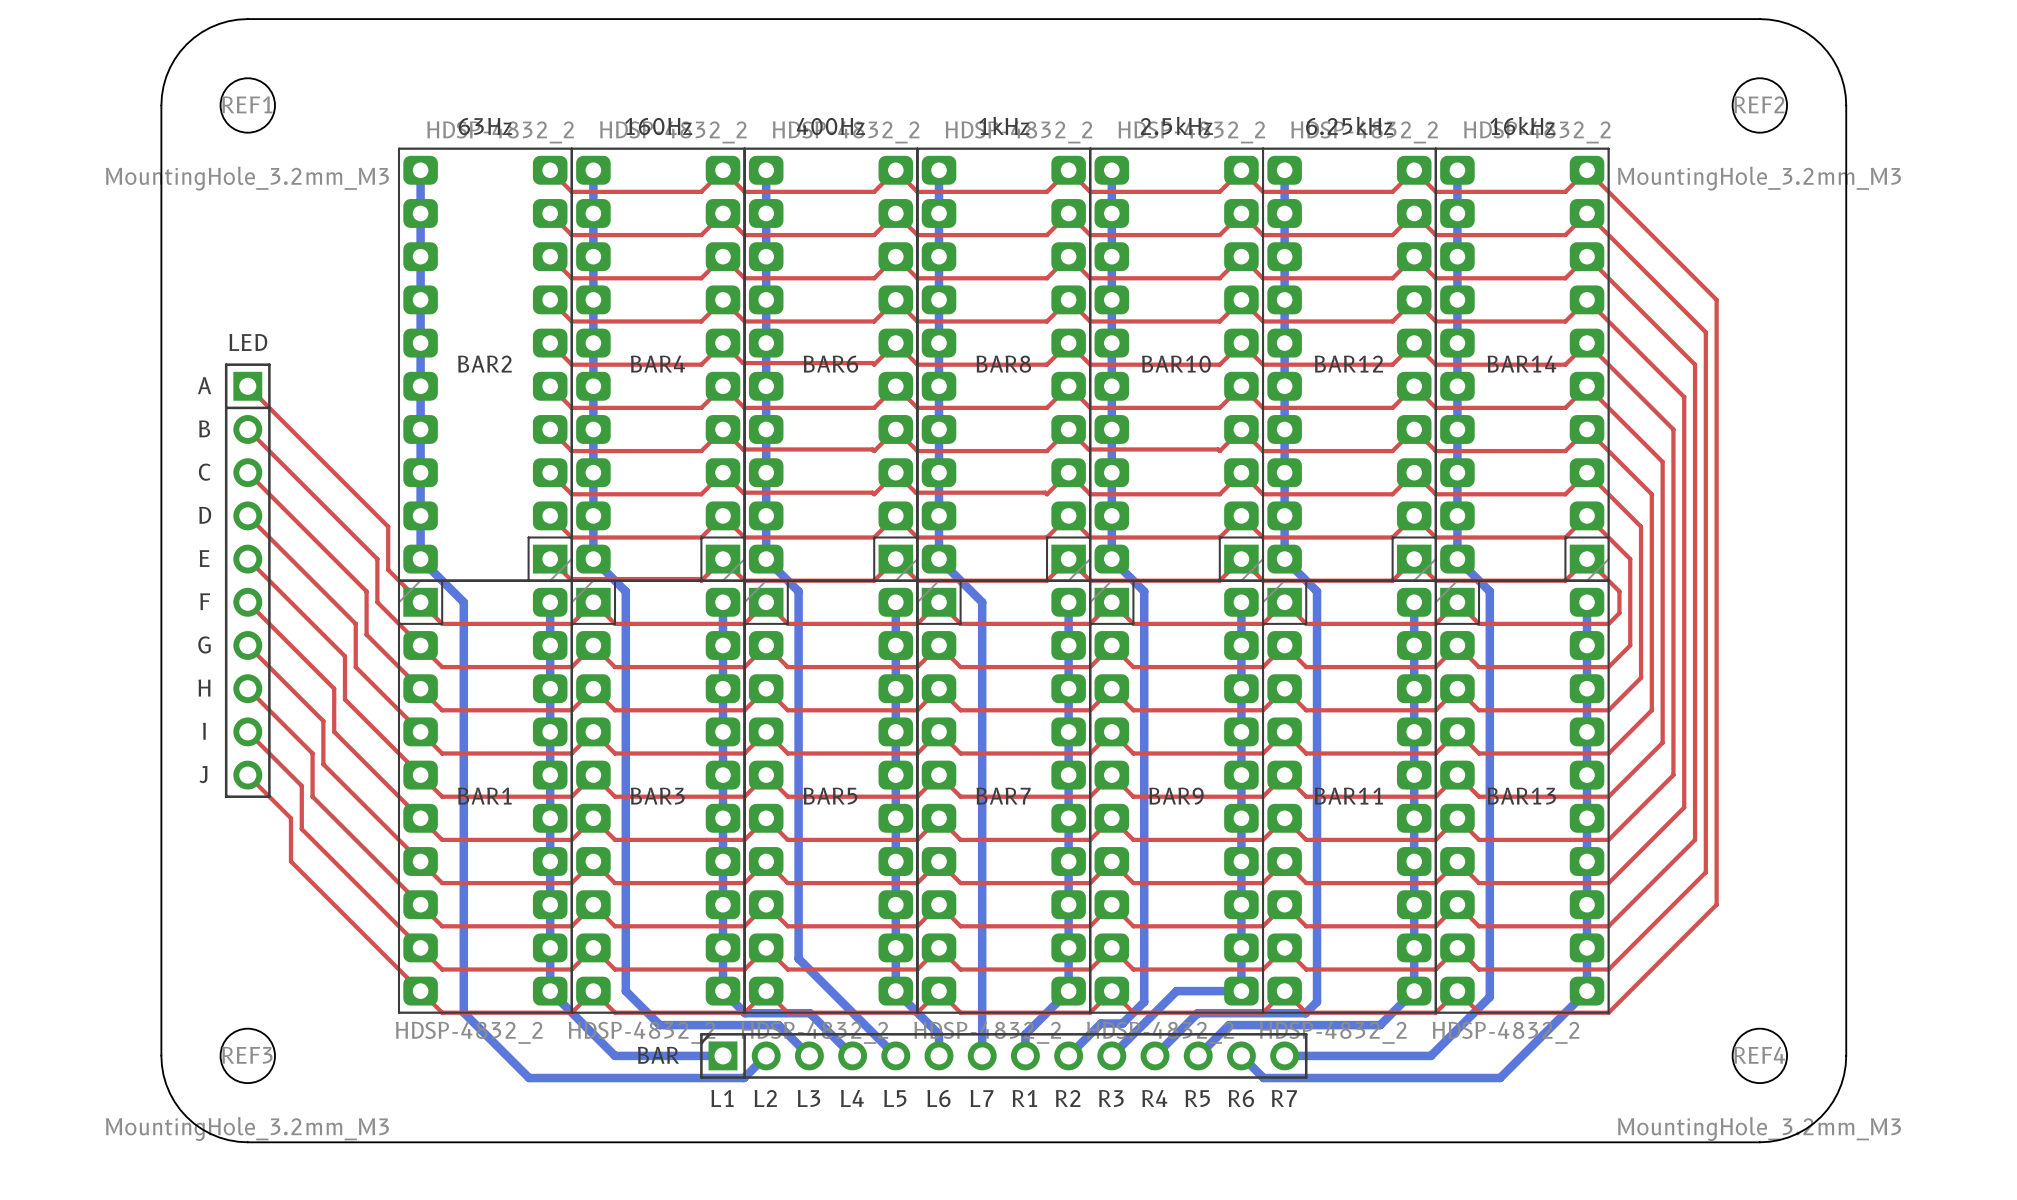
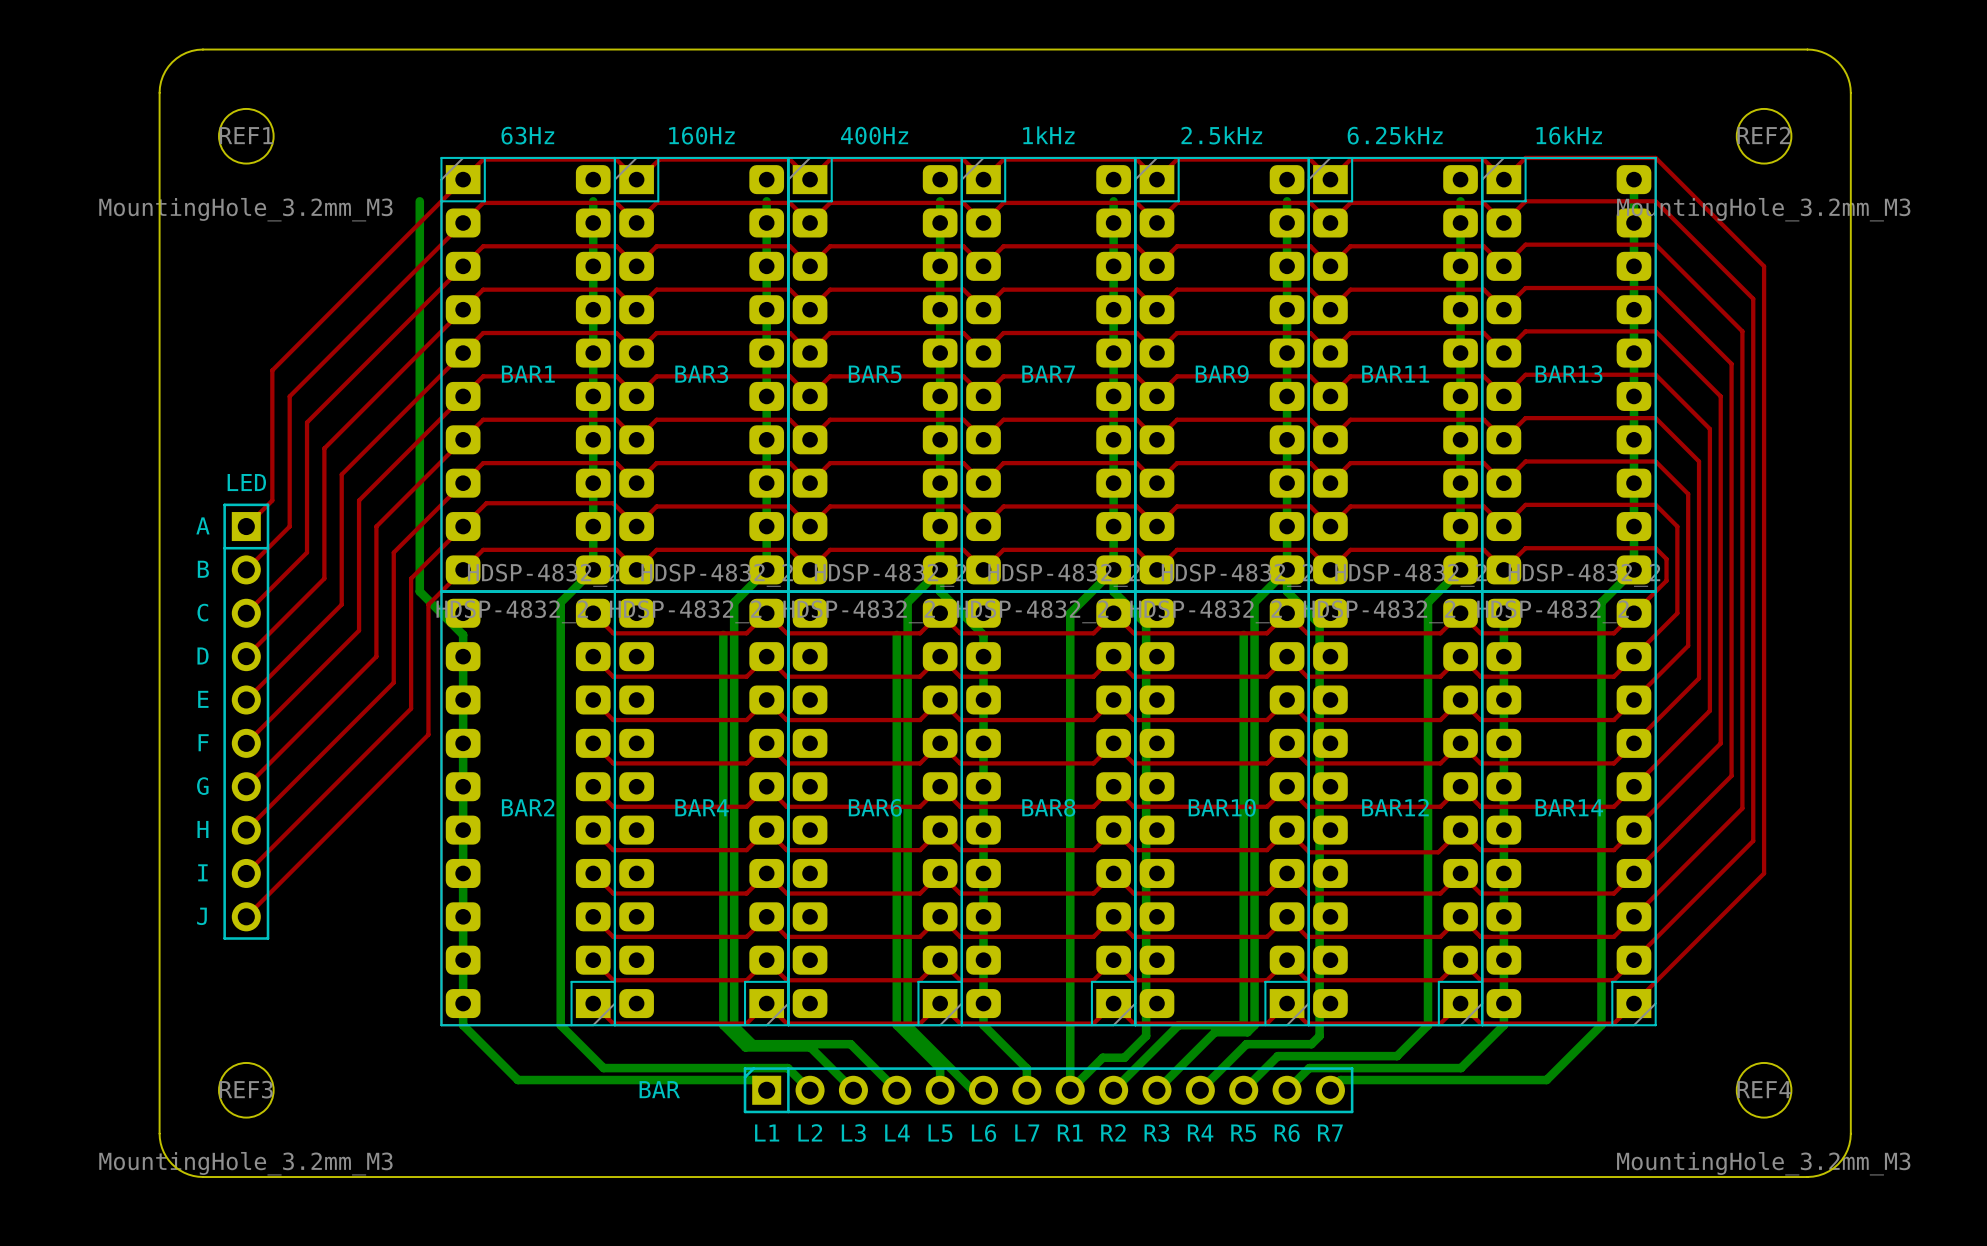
board edge: (247, 19) (219, 23) (201, 32) (186, 44) (174, 59) (166, 76) (161, 105) -> (246, 49) (197, 49) (181, 55) (172, 62) (162, 76) (159, 87) (159, 136)
board edge: (1759, 19) (1788, 23) (1805, 32) (1820, 44) (1833, 59) (1841, 76) (1846, 105) -> (1764, 49) (1817, 50) (1830, 56) (1838, 62) (1844, 69) (1849, 83) (1850, 136)
text position: 1kHz (1004, 125) -> 1kHz (1048, 135)
text position: 2.5kHz (1176, 125) -> 2.5kHz (1221, 135)
text position: 6.25kHz (1349, 125) -> 6.25kHz (1395, 135)
text position: 16kHz (1522, 125) -> 16kHz (1569, 135)
text position: 63Hz (485, 126) -> 63Hz (527, 135)
text position: 160Hz (658, 126) -> 160Hz (701, 135)
text position: 400Hz (831, 126) -> 400Hz (874, 135)
bottom track: none -> (1633, 179) (1633, 569) (1601, 602) (1601, 1025) (1546, 1080) (1340, 1080) (1330, 1090)
top track: (550, 170) (571, 191) (701, 191) (723, 170) (744, 191) (874, 191) (895, 170) (917, 191) (1047, 191) (1068, 170) (1090, 191) (1219, 191) (1241, 170) (1263, 191) (1392, 191) (1414, 170) (1435, 191) (1565, 191) (1587, 170) (1716, 299) (1716, 364) -> (246, 700) (341, 604) (341, 474) (483, 333) (616, 333) (636, 353) (656, 333) (790, 333) (810, 353) (830, 333) (963, 333) (983, 353) (1003, 333) (1136, 333) (1156, 353) (1177, 333) (1310, 333) (1330, 353) (1350, 333) (1483, 333) (1503, 353) (1525, 331) (1655, 331) (1720, 396)
top track: (550, 213) (571, 235) (701, 235) (723, 213) (744, 235) (874, 235) (895, 213) (917, 235) (1047, 235) (1068, 213) (1090, 235) (1219, 235) (1241, 213) (1263, 235) (1392, 235) (1414, 213) (1435, 235) (1565, 235) (1587, 213) (1705, 332) (1705, 397) -> (246, 743) (359, 630) (359, 500) (483, 376) (616, 376) (636, 396) (656, 376) (790, 376) (810, 396) (830, 376) (963, 376) (983, 396) (1003, 376) (1136, 376) (1156, 396) (1177, 376) (1310, 376) (1330, 396) (1350, 376) (1483, 376) (1503, 396) (1525, 374) (1655, 374) (1709, 428)
top track: (550, 256) (571, 278) (701, 278) (723, 256) (744, 278) (874, 278) (895, 256) (917, 278) (1047, 278) (1068, 256) (1090, 278) (1219, 278) (1241, 256) (1263, 278) (1392, 278) (1414, 256) (1435, 278) (1565, 278) (1587, 256) (1695, 364) (1695, 429) -> (376, 591) (376, 526) (483, 419) (616, 419) (636, 439) (656, 419) (790, 419) (810, 439) (830, 419) (963, 419) (983, 439) (1003, 419) (1136, 419) (1156, 439) (1177, 419) (1310, 419) (1330, 439) (1350, 419) (1483, 419) (1503, 439) (1525, 418) (1655, 418) (1699, 461)
top track: (550, 299) (571, 321) (701, 321) (723, 299) (744, 321) (874, 321) (895, 299) (917, 321) (1047, 321) (1068, 299) (1090, 321) (1219, 321) (1241, 299) (1263, 321) (1392, 321) (1414, 299) (1435, 321) (1565, 321) (1587, 299) (1684, 397) (1684, 461) -> (246, 830) (393, 682) (393, 552) (483, 463) (616, 463) (636, 483) (656, 463) (790, 463) (810, 483) (830, 463) (963, 463) (983, 483) (1003, 463) (1136, 463) (1156, 483) (1177, 463) (1310, 463) (1330, 483) (1350, 463) (1483, 463) (1503, 483) (1525, 461) (1655, 461) (1688, 494)
text position: LED (248, 342) -> LED (246, 482)
top track: (550, 343) (571, 364) (701, 364) (723, 343) (742, 363) (872, 363) (874, 364) (895, 343) (917, 364) (1047, 364) (1068, 343) (1090, 364) (1219, 364) (1241, 343) (1263, 364) (1392, 364) (1414, 343) (1435, 364) (1565, 364) (1587, 343) (1673, 429) (1673, 494) -> (246, 873) (411, 708) (411, 578) (486, 503) (613, 503) (636, 526) (656, 506) (790, 506) (810, 526) (830, 506) (963, 506) (983, 526) (1003, 506) (1136, 506) (1156, 526) (1177, 506) (1310, 506) (1330, 526) (1350, 506) (1483, 506) (1503, 526) (1525, 504) (1655, 504) (1677, 526)
BAR2 position: (485, 364) -> (528, 808)
BAR4 position: (658, 364) -> (701, 808)
BAR6 position: (831, 364) -> (875, 808)
BAR8 position: (1003, 364) -> (1048, 808)
BAR10 position: (1176, 364) -> (1222, 808)
BAR12 position: (1349, 364) -> (1395, 808)
BAR14 position: (1522, 364) -> (1568, 808)
text position: A (204, 385) -> A (202, 525)
top track: (247, 386) (388, 526) (388, 569) (442, 623) (571, 623) (593, 602) (615, 623) (744, 623) (766, 602) (787, 623) (917, 623) (939, 602) (960, 623) (1090, 623) (1111, 602) (1133, 623) (1263, 623) (1284, 602) (1306, 623) (1435, 623) (1457, 602) (1479, 623) (1608, 623) (1619, 613) (1619, 591) (1587, 559) (1565, 580) (1435, 580) (1414, 559) (1392, 580) (1263, 580) (1241, 559) (1219, 580) (1090, 580) (1068, 559) (1047, 580) (917, 580) (895, 559) (874, 580) (744, 580) (723, 559) (701, 580) (699, 579) (570, 579) (550, 559) -> none
top track: (550, 386) (571, 407) (701, 407) (723, 386) (744, 407) (874, 407) (895, 386) (917, 407) (1047, 407) (1068, 386) (1090, 407) (1219, 407) (1241, 386) (1263, 407) (1392, 407) (1414, 386) (1435, 407) (1565, 407) (1587, 386) (1662, 461) (1662, 526) -> (246, 916) (428, 734) (428, 604) (483, 549) (616, 549) (636, 569) (656, 549) (790, 549) (810, 569) (830, 549) (963, 549) (983, 569) (1003, 549) (1136, 549) (1156, 569) (1177, 549) (1310, 549) (1330, 569) (1350, 549) (1483, 549) (1503, 569) (1525, 548) (1655, 548) (1666, 559)
line: (226, 407) (269, 407) -> (224, 548) (268, 548)
text position: B (204, 428) -> B (203, 569)
top track: (247, 429) (377, 559) -> none
top track: (550, 429) (571, 451) (701, 451) (723, 429) (742, 449) (872, 449) (874, 451) (895, 429) (917, 451) (1047, 451) (1068, 429) (1088, 449) (1218, 449) (1219, 451) (1241, 429) (1263, 451) (1392, 451) (1414, 429) (1435, 451) (1565, 451) (1587, 429) (1651, 494) (1651, 710) (1608, 753) (1479, 753) (1457, 731) (1435, 753) (1306, 753) (1284, 731) (1263, 753) (1133, 753) (1111, 731) (1090, 753) (960, 753) (939, 731) (917, 753) (787, 753) (766, 731) (744, 753) (615, 753) (593, 731) (571, 753) (442, 753) (355, 667) (355, 623) (247, 515) -> none
text position: C (204, 472) -> C (202, 612)
line: (226, 472) (226, 364) (269, 364) (269, 472) -> (224, 504) (268, 504)
top track: (247, 472) (366, 591) (366, 634) (442, 710) (571, 710) (593, 688) (615, 710) (744, 710) (766, 688) (787, 710) (917, 710) (939, 688) (960, 710) (1090, 710) (1111, 688) (1133, 710) (1263, 710) (1284, 688) (1306, 710) (1435, 710) (1457, 688) (1479, 710) (1608, 710) (1641, 677) (1641, 526) (1587, 472) (1565, 494) (1435, 494) (1414, 472) (1392, 494) (1263, 494) (1241, 472) (1219, 494) (1090, 494) (1068, 472) (1047, 494) (1045, 492) (915, 492) (895, 472) (874, 494) (872, 492) (742, 492) (723, 472) (701, 494) (571, 494) (550, 472) -> none
top track: none -> (246, 526) (272, 500) (272, 370) (483, 159) (616, 159) (636, 179) (636, 182) (659, 159) (790, 159) (810, 179) (830, 159) (963, 159) (983, 179) (1003, 159) (1136, 159) (1156, 179) (1177, 159) (1310, 159) (1330, 179) (1350, 159) (1483, 159) (1503, 179) (1525, 157) (1655, 157) (1764, 266) (1764, 873) (1613, 1023) (1480, 1023) (1460, 1003) (1440, 1023) (1307, 1023) (1287, 1003) (1267, 1023) (1133, 1023) (1113, 1003) (1093, 1023) (960, 1023) (940, 1003) (920, 1023) (786, 1023) (766, 1003) (746, 1023) (613, 1023) (593, 1003)
text position: D (205, 515) -> D (203, 655)
top track: (550, 515) (571, 537) (701, 537) (723, 515) (744, 537) (874, 537) (895, 515) (917, 537) (1047, 537) (1068, 515) (1090, 537) (1219, 537) (1241, 515) (1263, 537) (1392, 537) (1414, 515) (1435, 537) (1565, 537) (1587, 515) (1630, 559) (1630, 645) (1608, 667) (1479, 667) (1457, 645) (1435, 667) (1306, 667) (1284, 645) (1263, 667) (1133, 667) (1111, 645) (1090, 667) (960, 667) (939, 645) (917, 667) (787, 667) (766, 645) (744, 667) (615, 667) (593, 645) (571, 667) (442, 667) (377, 602) -> (246, 786) (376, 656) (376, 634)
top track: none -> (246, 569) (289, 526) (289, 396) (483, 202) (616, 202) (636, 222) (656, 202) (790, 202) (810, 222) (830, 202) (963, 202) (983, 222) (1003, 202) (1136, 202) (1156, 222) (1177, 202) (1310, 202) (1330, 222) (1350, 202) (1483, 202) (1503, 222) (1525, 201) (1655, 201) (1753, 298) (1753, 840) (1613, 980) (1480, 980) (1460, 960) (1440, 980) (1307, 980) (1287, 960) (1267, 980) (1133, 980) (1113, 960) (1093, 980) (960, 980) (940, 960) (920, 980) (786, 980) (766, 960) (746, 980) (613, 980) (593, 960)
bottom track: (593, 537) (593, 559) (625, 591) (625, 991) (659, 1025) (778, 1025) (787, 1033) -> (593, 569) (560, 602) (560, 1025) (603, 1068) (787, 1068)
bottom track: (766, 537) (766, 559) (798, 591) (798, 958) (849, 1009) -> (766, 569) (734, 602) (734, 1025) (753, 1044) (850, 1044)
bottom track: none -> (940, 569) (907, 602) (907, 1025) (972, 1090) (983, 1090)
bottom track: none -> (1113, 569) (1070, 613) (1070, 634)
bottom track: none -> (1287, 569) (1254, 602) (1254, 1025) (1247, 1032) (1215, 1032) (1199, 1047)
bottom track: (1457, 537) (1457, 559) (1489, 591) (1489, 997) (1430, 1055) (1284, 1055) -> (1460, 569) (1428, 602) (1428, 1025) (1397, 1056) (1277, 1056) (1243, 1090)
top track: (1662, 548) (1662, 742) (1608, 796) (1479, 796) (1457, 775) (1435, 796) (1306, 796) (1284, 775) (1263, 796) (1133, 796) (1111, 775) (1090, 796) (960, 796) (939, 775) (917, 796) (787, 796) (766, 775) (744, 796) (615, 796) (593, 775) (571, 796) (442, 796) (344, 699) (344, 656) (247, 559) -> (1666, 580) (1613, 633) (1480, 633) (1460, 613) (1440, 633) (1307, 633) (1287, 613) (1267, 633) (1133, 633) (1113, 613) (1093, 633) (960, 633) (940, 613) (920, 633) (786, 633) (766, 613) (746, 633) (613, 633) (593, 613)
text position: E (204, 558) -> E (203, 699)
top track: none -> (246, 613) (307, 552) (307, 422) (483, 246) (616, 246) (636, 266) (656, 246) (790, 246) (810, 266) (830, 246) (963, 246) (983, 266) (1003, 246) (1136, 246) (1156, 266) (1177, 246) (1310, 246) (1330, 266) (1350, 246) (1483, 246) (1503, 266) (1525, 244) (1655, 244) (1742, 331) (1742, 808) (1613, 936) (1480, 936) (1460, 916) (1440, 936) (1307, 936) (1287, 916) (1267, 936) (1133, 936) (1113, 916) (1093, 936) (960, 936) (940, 916) (920, 936) (786, 936) (766, 916) (746, 936) (613, 936) (593, 916)
part position: (247, 580) -> (246, 721)
bottom track: none -> (1503, 613) (1503, 1025) (1461, 1068) (1309, 1068) (1287, 1090)
top track: (1673, 580) (1673, 775) (1608, 839) (1479, 839) (1457, 818) (1435, 839) (1306, 839) (1284, 818) (1263, 839) (1133, 839) (1111, 818) (1090, 839) (960, 839) (939, 818) (917, 839) (787, 839) (766, 818) (744, 839) (615, 839) (593, 818) (571, 839) (442, 839) (334, 731) (334, 688) (247, 602) -> (1677, 613) (1613, 676) (1480, 676) (1460, 656) (1440, 676) (1307, 676) (1287, 656) (1267, 676) (1133, 676) (1113, 656) (1093, 676) (960, 676) (940, 656) (920, 676) (786, 676) (766, 656) (746, 676) (613, 676) (593, 656)
text position: F (205, 601) -> F (203, 742)
bottom track: (550, 602) (550, 991) (615, 1055) (723, 1055) -> none
bottom track: (1414, 602) (1414, 991) (1380, 1025) (1229, 1025) -> none
bottom track: (1587, 602) (1587, 991) (1500, 1078) (1263, 1078) (1241, 1055) -> none
top track: (1684, 613) (1684, 807) (1608, 883) (1479, 883) (1457, 861) (1435, 883) (1306, 883) (1284, 861) (1263, 883) (1133, 883) (1111, 861) (1090, 883) (960, 883) (939, 861) (917, 883) (787, 883) (766, 861) (744, 883) (615, 883) (593, 861) (571, 883) (442, 883) (323, 764) (323, 721) (247, 645) -> (1688, 645) (1613, 720) (1480, 720) (1460, 700) (1440, 720) (1307, 720) (1287, 700) (1267, 720) (1133, 720) (1113, 700) (1093, 720) (960, 720) (940, 700) (920, 720) (786, 720) (766, 700) (746, 720) (613, 720) (593, 700)
top track: none -> (246, 656) (324, 578) (324, 448) (483, 289) (616, 289) (636, 309) (656, 289) (790, 289) (810, 309) (830, 289) (963, 289) (983, 309) (1003, 289) (1136, 289) (1156, 309) (1177, 289) (1310, 289) (1330, 309) (1350, 289) (1483, 289) (1503, 309) (1525, 288) (1655, 288) (1731, 363) (1731, 775) (1613, 893) (1480, 893) (1460, 873) (1440, 893) (1307, 893) (1287, 873) (1267, 893) (1133, 893) (1113, 873) (1093, 893) (960, 893) (940, 873) (920, 893) (786, 893) (766, 873) (746, 893) (613, 893) (593, 873)
text position: G (204, 644) -> G (202, 786)
top track: (1695, 645) (1695, 839) (1608, 926) (1479, 926) (1457, 904) (1435, 926) (1306, 926) (1284, 904) (1263, 926) (1133, 926) (1111, 904) (1090, 926) (960, 926) (939, 904) (917, 926) (787, 926) (766, 904) (744, 926) (615, 926) (593, 904) (571, 926) (442, 926) (312, 796) (312, 753) (247, 688) -> (1699, 678) (1613, 763) (1480, 763) (1460, 743) (1440, 763) (1307, 763) (1287, 743) (1267, 763) (1133, 763) (1113, 743) (1093, 763) (960, 763) (940, 743) (920, 763) (786, 763) (766, 743) (746, 763) (613, 763) (593, 743)
top track: (1705, 677) (1705, 872) (1608, 969) (1479, 969) (1457, 947) (1435, 969) (1306, 969) (1284, 947) (1263, 969) (1133, 969) (1111, 947) (1090, 969) (960, 969) (939, 947) (917, 969) (787, 969) (766, 947) (744, 969) (615, 969) (593, 947) (571, 969) (442, 969) (301, 829) (301, 785) (247, 731) -> (1709, 710) (1613, 806) (1480, 806) (1460, 786) (1440, 806) (1307, 806) (1287, 786) (1267, 806) (1133, 806) (1113, 786) (1093, 806) (960, 806) (940, 786) (920, 806) (786, 806) (766, 786) (746, 806) (613, 806) (593, 786)
text position: H (204, 688) -> H (202, 829)
top track: (1716, 710) (1716, 904) (1608, 1012) (1479, 1012) (1457, 991) (1435, 1012) (1306, 1012) (1284, 991) (1263, 1012) (1133, 1012) (1111, 991) (1090, 1012) (960, 1012) (939, 991) (917, 1012) (787, 1012) (766, 991) (744, 1012) (615, 1012) (593, 991) (571, 1012) (442, 1012) (290, 861) (290, 818) (247, 775) -> (1720, 743) (1613, 850) (1480, 850) (1460, 830) (1438, 852) (1309, 852) (1287, 830) (1267, 850) (1133, 850) (1113, 830) (1093, 850) (960, 850) (940, 830) (920, 850) (786, 850) (766, 830) (746, 850) (613, 850) (593, 830)
text position: I (204, 731) -> I (202, 872)
text position: J (203, 774) -> J (202, 916)
line: (226, 796) (269, 796) -> (224, 830) (224, 938) (268, 938) (268, 830)
BAR1 position: (485, 796) -> (528, 374)
BAR3 position: (658, 796) -> (701, 374)
BAR5 position: (831, 796) -> (875, 374)
BAR7 position: (1003, 796) -> (1048, 374)
BAR9 position: (1176, 796) -> (1222, 374)
BAR11 position: (1349, 796) -> (1395, 374)
BAR13 position: (1522, 796) -> (1568, 374)
bottom track: (463, 991) (463, 1012) (529, 1078) (744, 1078) (766, 1055) -> (463, 1025) (517, 1080) (756, 1080) (766, 1090)
bottom track: (982, 991) (982, 1055) -> (983, 1025) (1026, 1068)
bottom track: (1068, 991) (1025, 1034) -> (1070, 1025) (1070, 1090)
bottom track: (1308, 1009) (1305, 1013) (1197, 1013) -> (1311, 1044) (1246, 1044) (1231, 1059)
line: (710, 1034) (701, 1042) -> (753, 1068) (745, 1077)
line: (744, 1034) (701, 1034) (701, 1077) (744, 1077) -> none
line: none -> (788, 1068) (788, 1111)
line: (1306, 1034) (1306, 1077) -> (1308, 1068) (1352, 1068) (1352, 1111) (1308, 1111)
board edge: (161, 1055) (166, 1084) (174, 1101) (186, 1117) (201, 1129) (219, 1137) (247, 1142) -> (159, 1090) (160, 1143) (166, 1156) (172, 1164) (184, 1172) (193, 1175) (246, 1177)
part position: (1003, 1055) -> (1048, 1090)
board edge: (1846, 1055) (1844, 1075) (1837, 1093) (1820, 1117) (1797, 1133) (1779, 1140) (1759, 1142) -> (1850, 1090) (1850, 1139) (1847, 1150) (1838, 1164) (1824, 1173) (1813, 1176) (1764, 1177)
text: L1 (722, 1098) -> none
text: L2 (765, 1098) -> L1 (767, 1133)
text: L3 (808, 1098) -> L2 (810, 1132)
text: L4 (852, 1098) -> L3 (853, 1133)
text: L5 (895, 1098) -> L4 (897, 1133)
text: L6 (938, 1098) -> L5 (940, 1133)
text: L7 (981, 1098) -> L6 (983, 1133)
text: R1 (1024, 1098) -> L7 (1027, 1133)
text: R2 (1068, 1098) -> R1 (1070, 1133)
text: R3 (1111, 1098) -> R2 (1113, 1132)
text: R4 (1154, 1098) -> R3 (1156, 1133)
text: R5 (1197, 1098) -> R4 (1200, 1133)
text: R6 (1241, 1098) -> R5 (1243, 1133)
text: R7 (1284, 1098) -> R6 (1287, 1133)
text: none -> R7 (1330, 1133)

